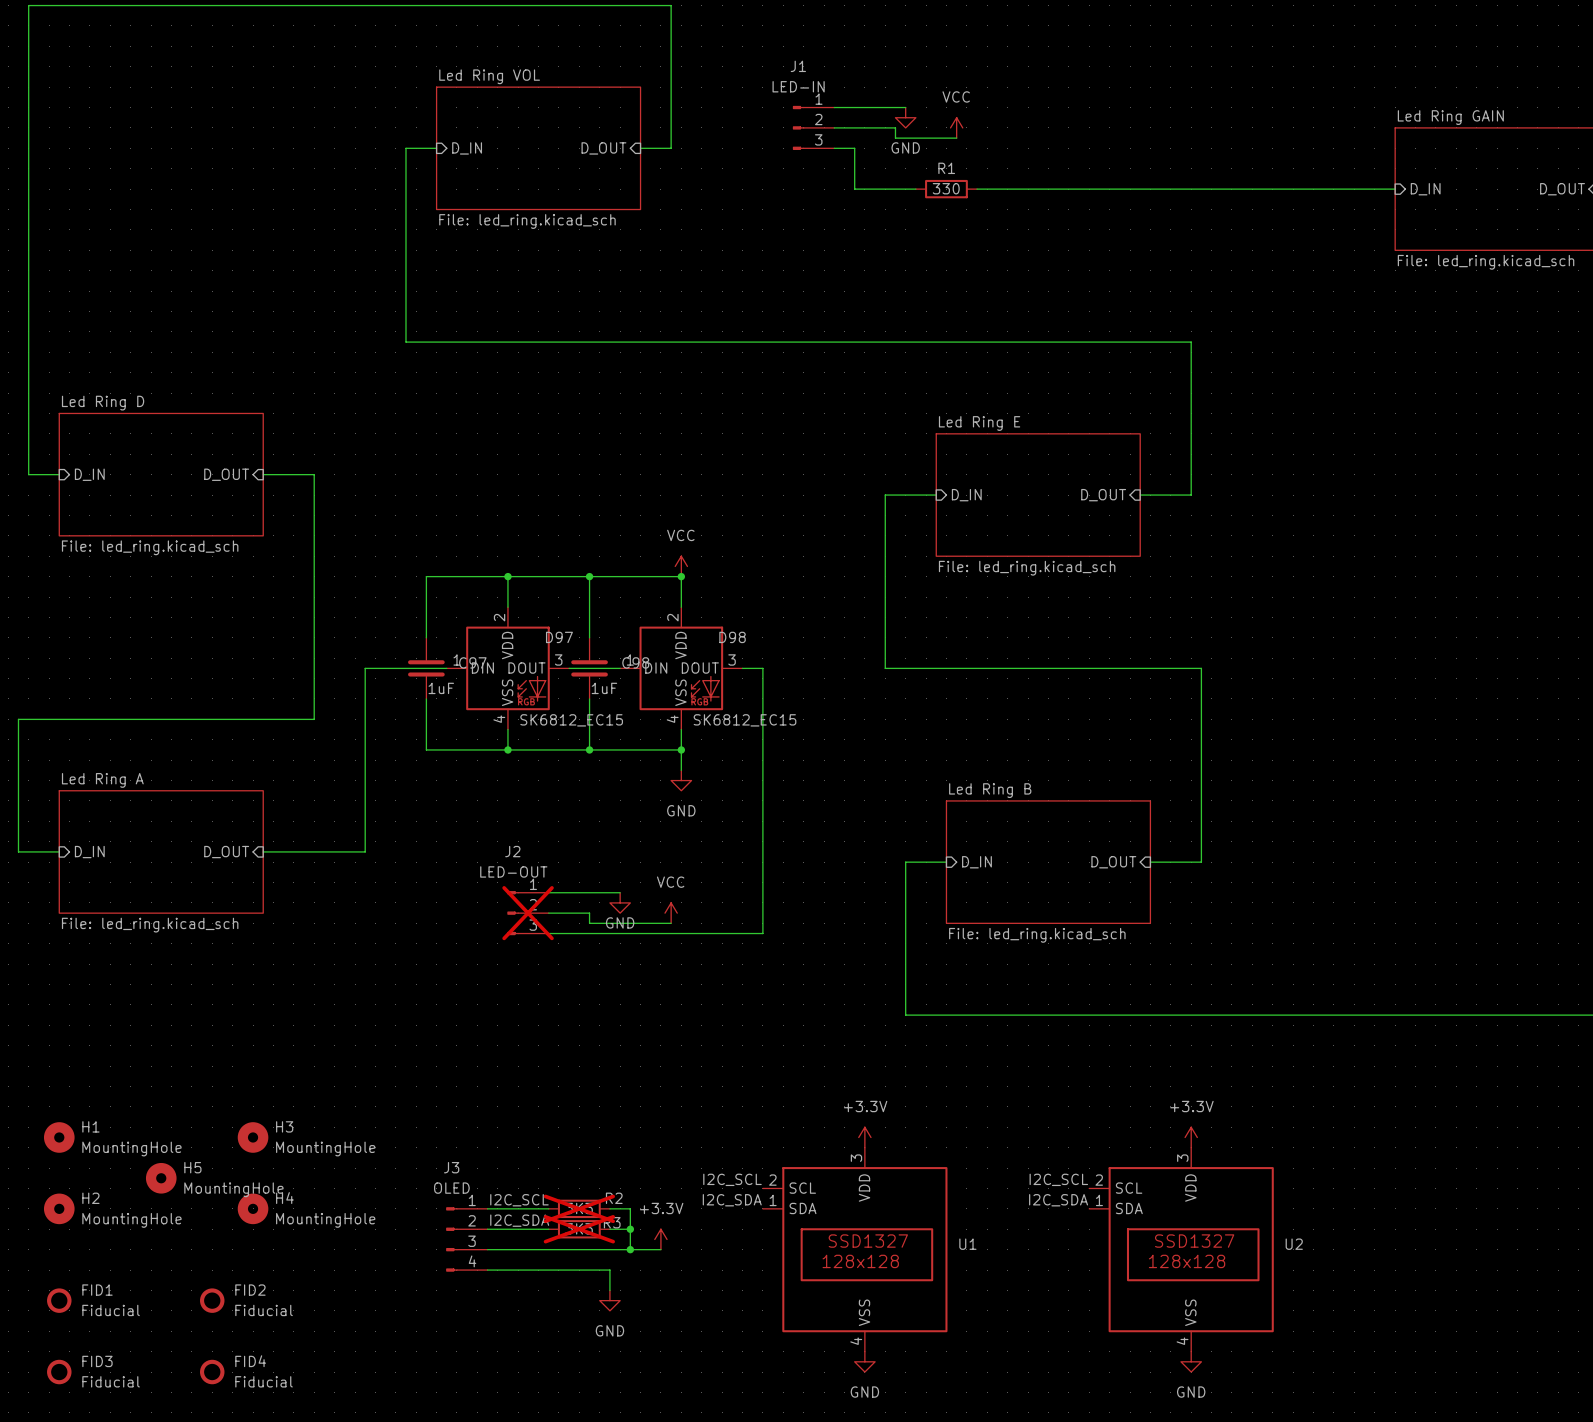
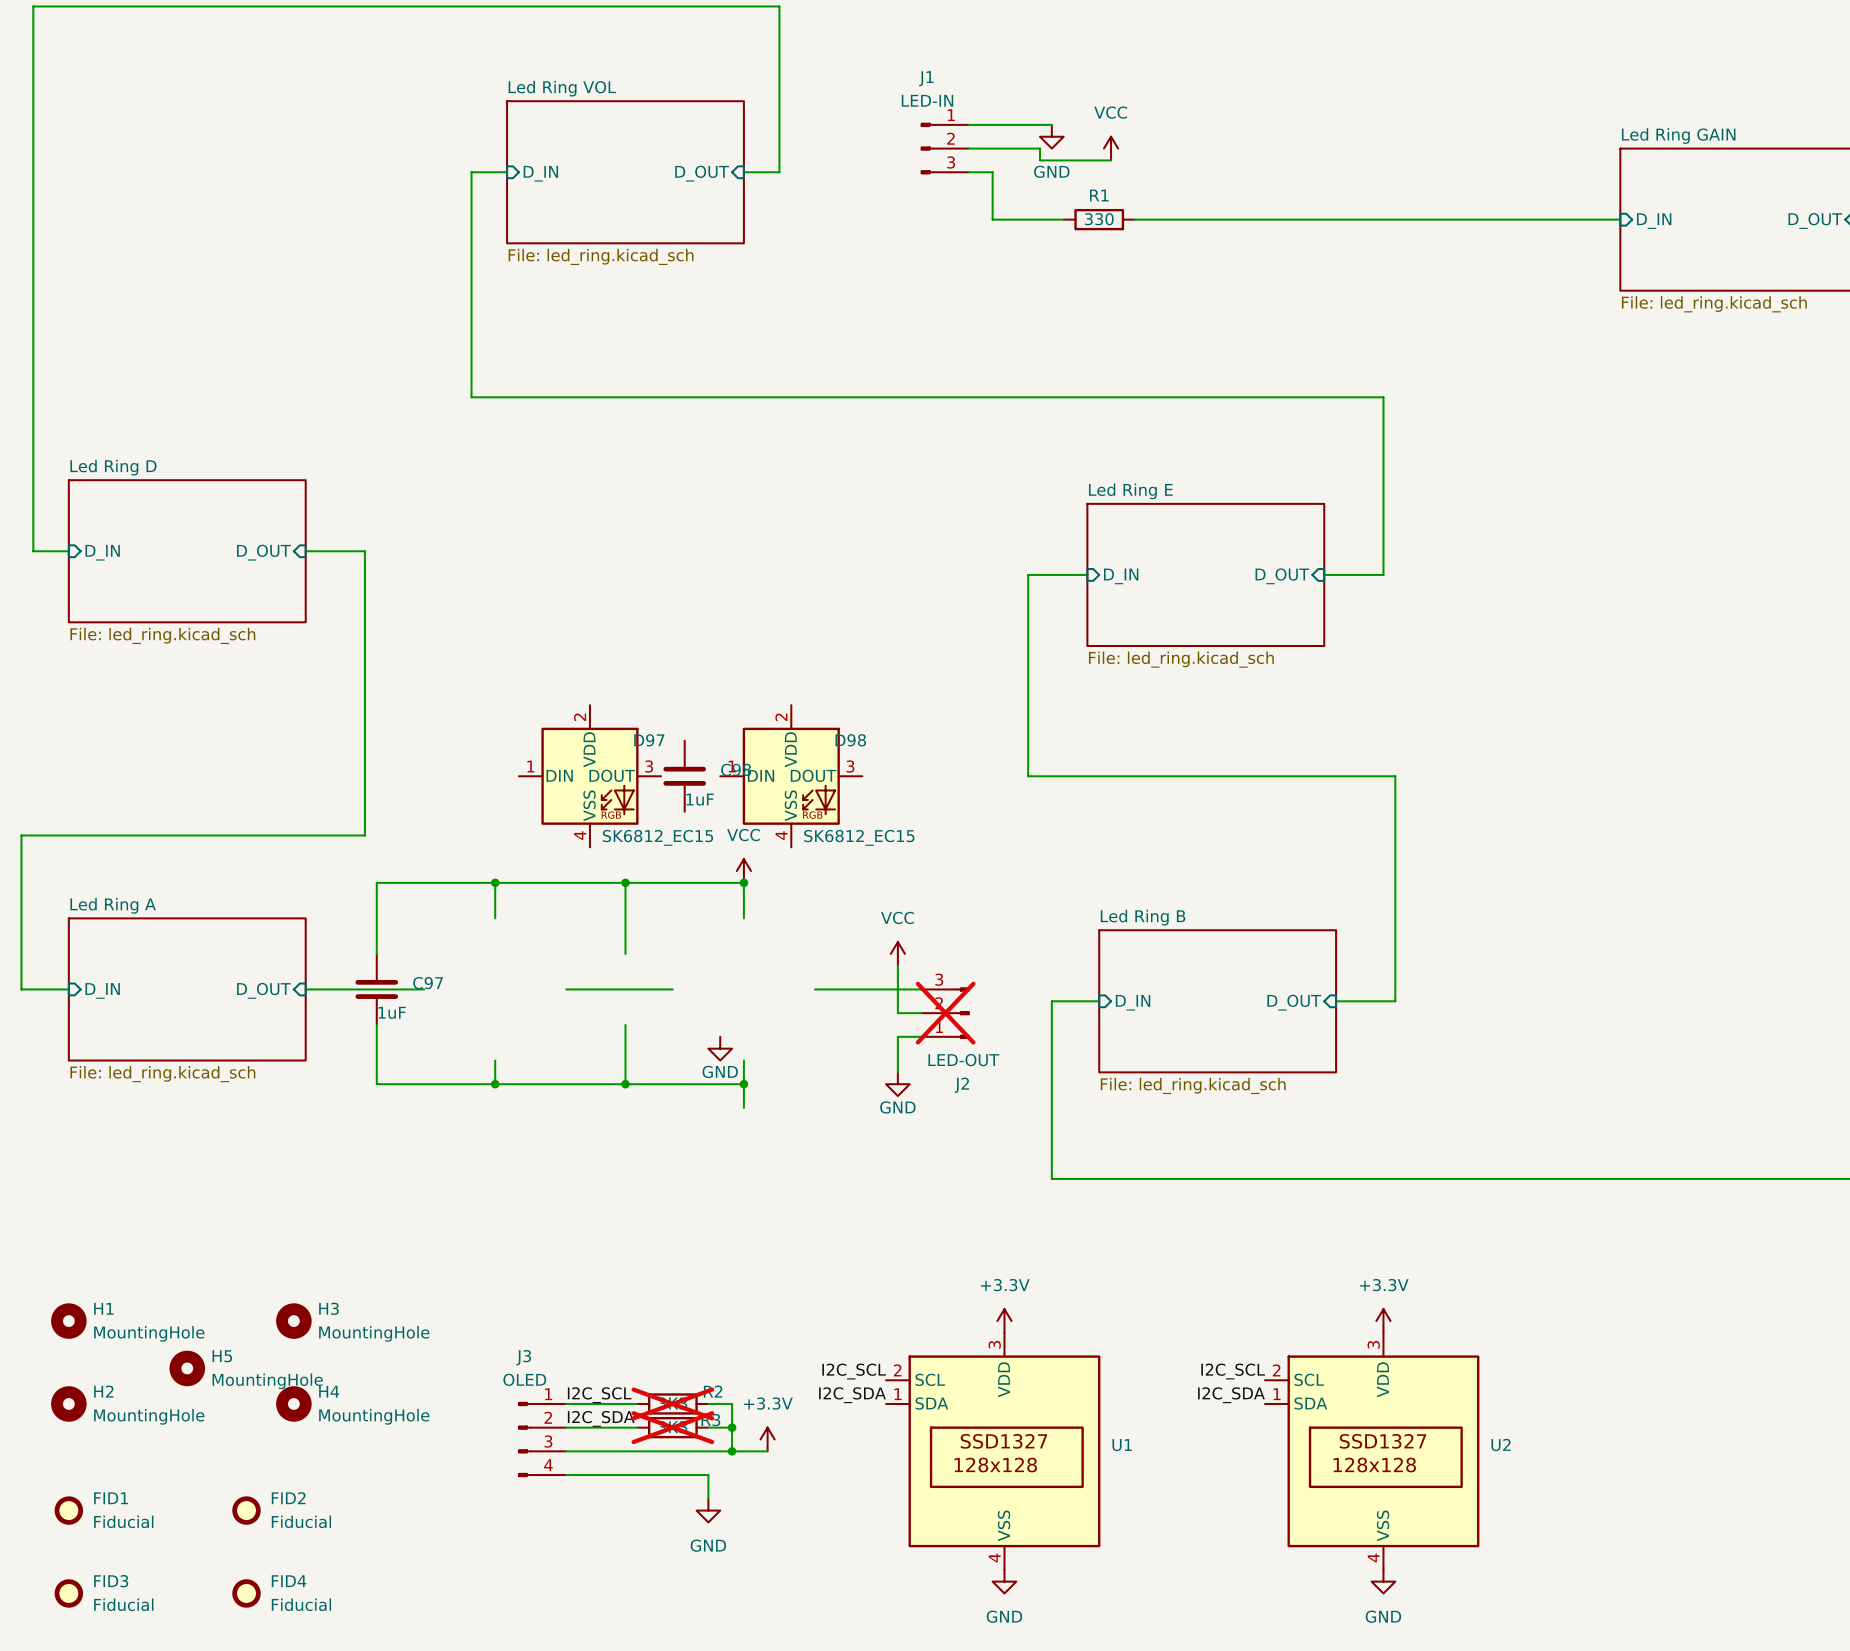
power symbol: VCC (681, 566) -> none
wire: (507, 576) (507, 607) -> none
junction: (507, 576) -> none
wire: (589, 576) (589, 637) -> (625, 882) (625, 953)
junction: (589, 576) -> none
junction: (681, 576) -> none
wire: (681, 607) (681, 576) (426, 576) (426, 637) -> none
C97 position: (426, 668) -> (376, 989)
wire: (446, 668) (365, 668) (365, 851) -> none
wire: (569, 668) (620, 668) -> none
wire: (742, 668) (762, 668) (762, 933) (640, 933) -> none
wire: (426, 698) (426, 749) (681, 749) -> none
wire: (589, 698) (589, 749) -> (625, 1024) (625, 1084)
wire: (507, 729) (507, 749) -> none
wire: (681, 729) (681, 770) -> (743, 1060) (743, 1107)
junction: (507, 749) -> none
junction: (589, 749) -> none
power symbol: none -> VCC (743, 871)
junction: (681, 749) -> none
wire: none -> (495, 882) (495, 918)
junction: none -> (495, 882)
junction: none -> (625, 882)
junction: none -> (743, 882)
power symbol position: GND (681, 780) -> GND (897, 1084)
wire: none -> (743, 918) (743, 882) (376, 882) (376, 953)
power symbol text position: GND (681, 810) -> GND (897, 1107)
power symbol: none -> VCC (897, 953)
wire: none -> (897, 965) (897, 1013) (921, 1013)
wire: none -> (566, 989) (672, 989)
wire: none -> (814, 989) (921, 989)
wire: none -> (376, 1024) (376, 1084) (637, 1084)
wire: (548, 892) (620, 892) -> none
wire: none -> (921, 1036) (897, 1036) (897, 1072)
wire: none -> (495, 1060) (495, 1084)
J2 rotation: 0° (513, 913) -> 180° (963, 1013)
J2 position: (528, 913) -> (945, 1013)
wire: (548, 913) (589, 913) (589, 923) (671, 923) -> none
power symbol: VCC (671, 913) -> none
junction: none -> (495, 1084)
junction: none -> (625, 1084)
junction: none -> (743, 1084)

